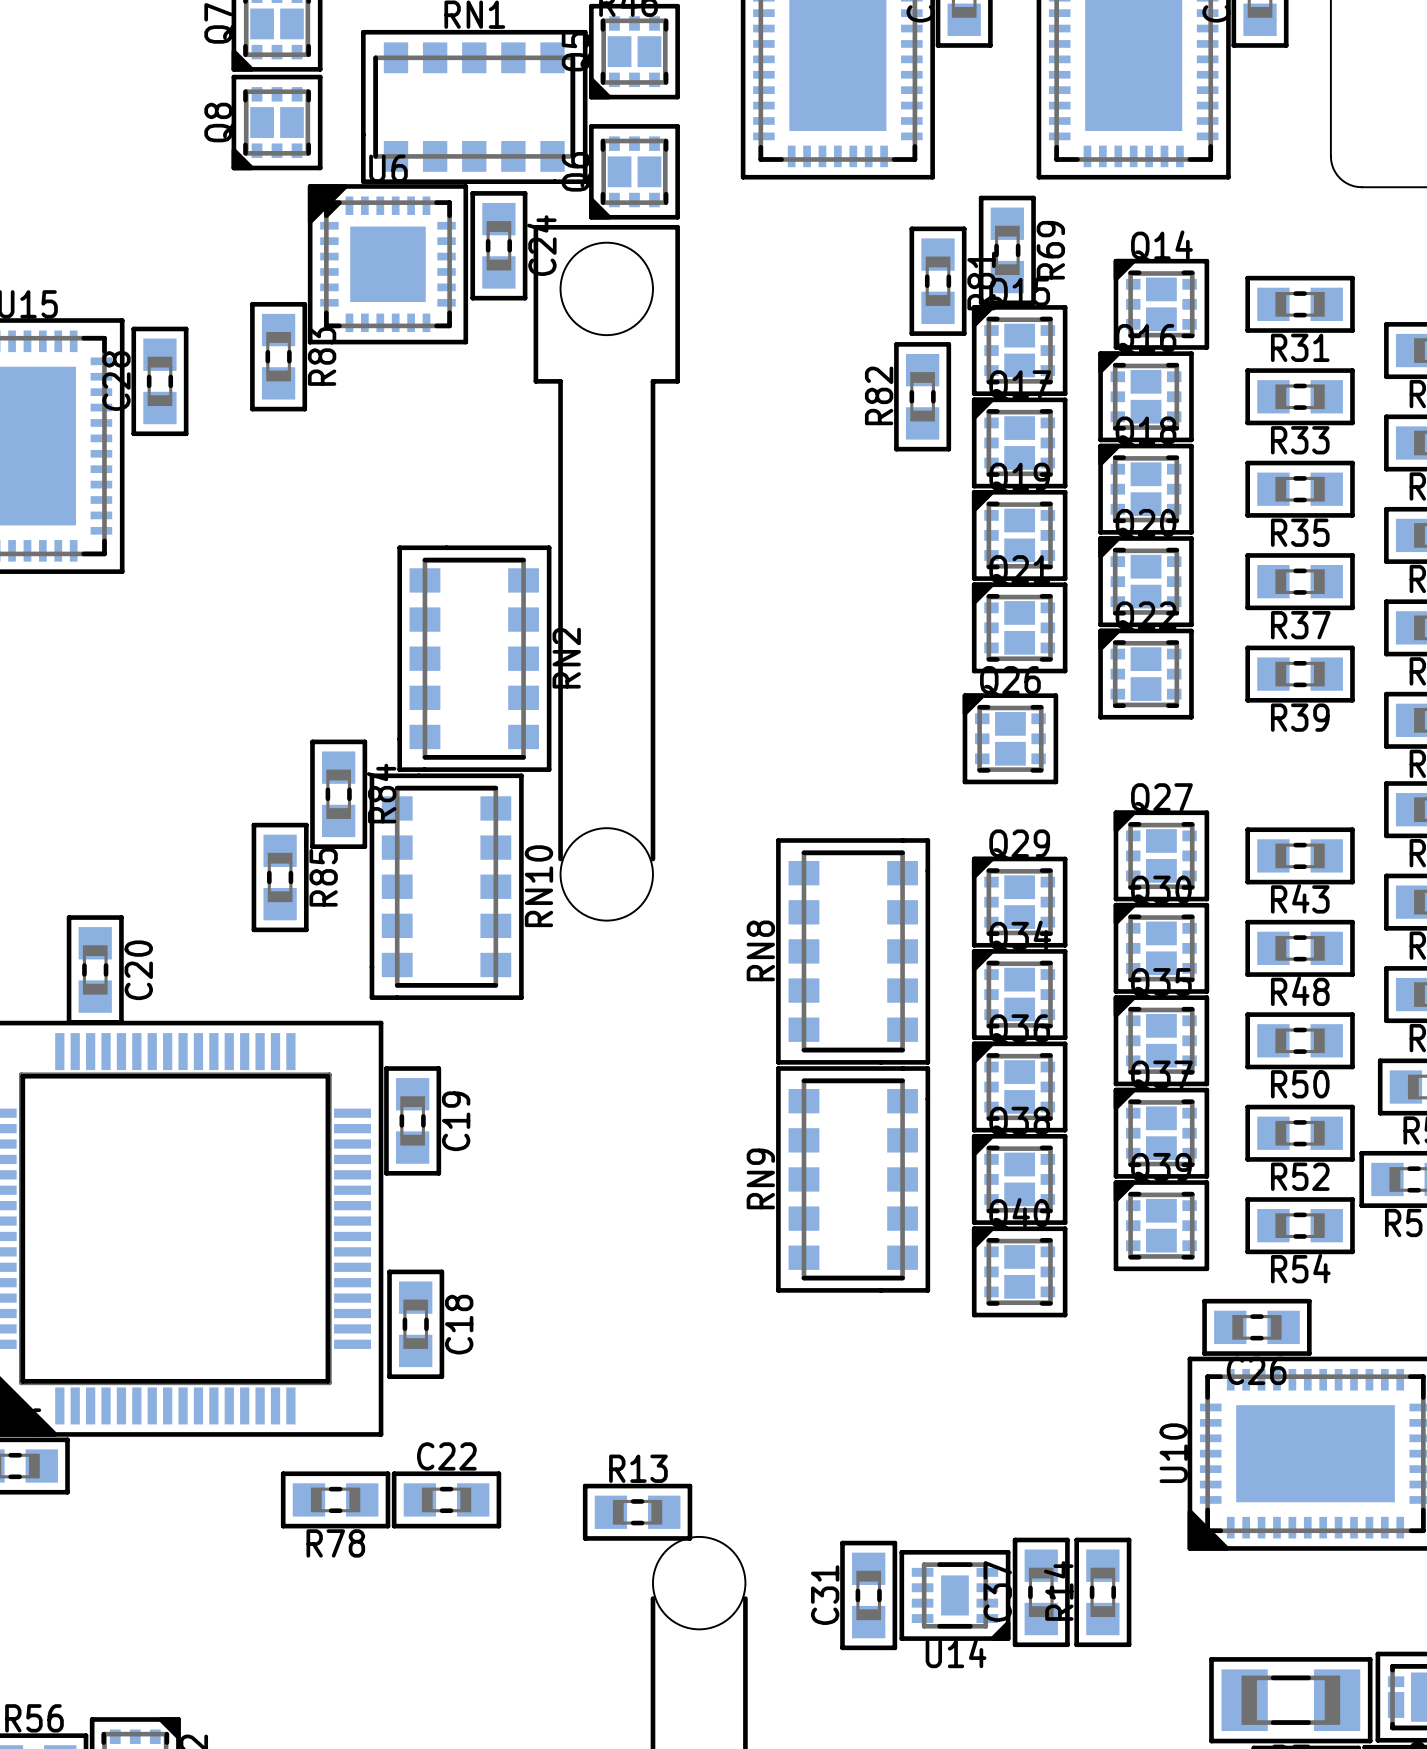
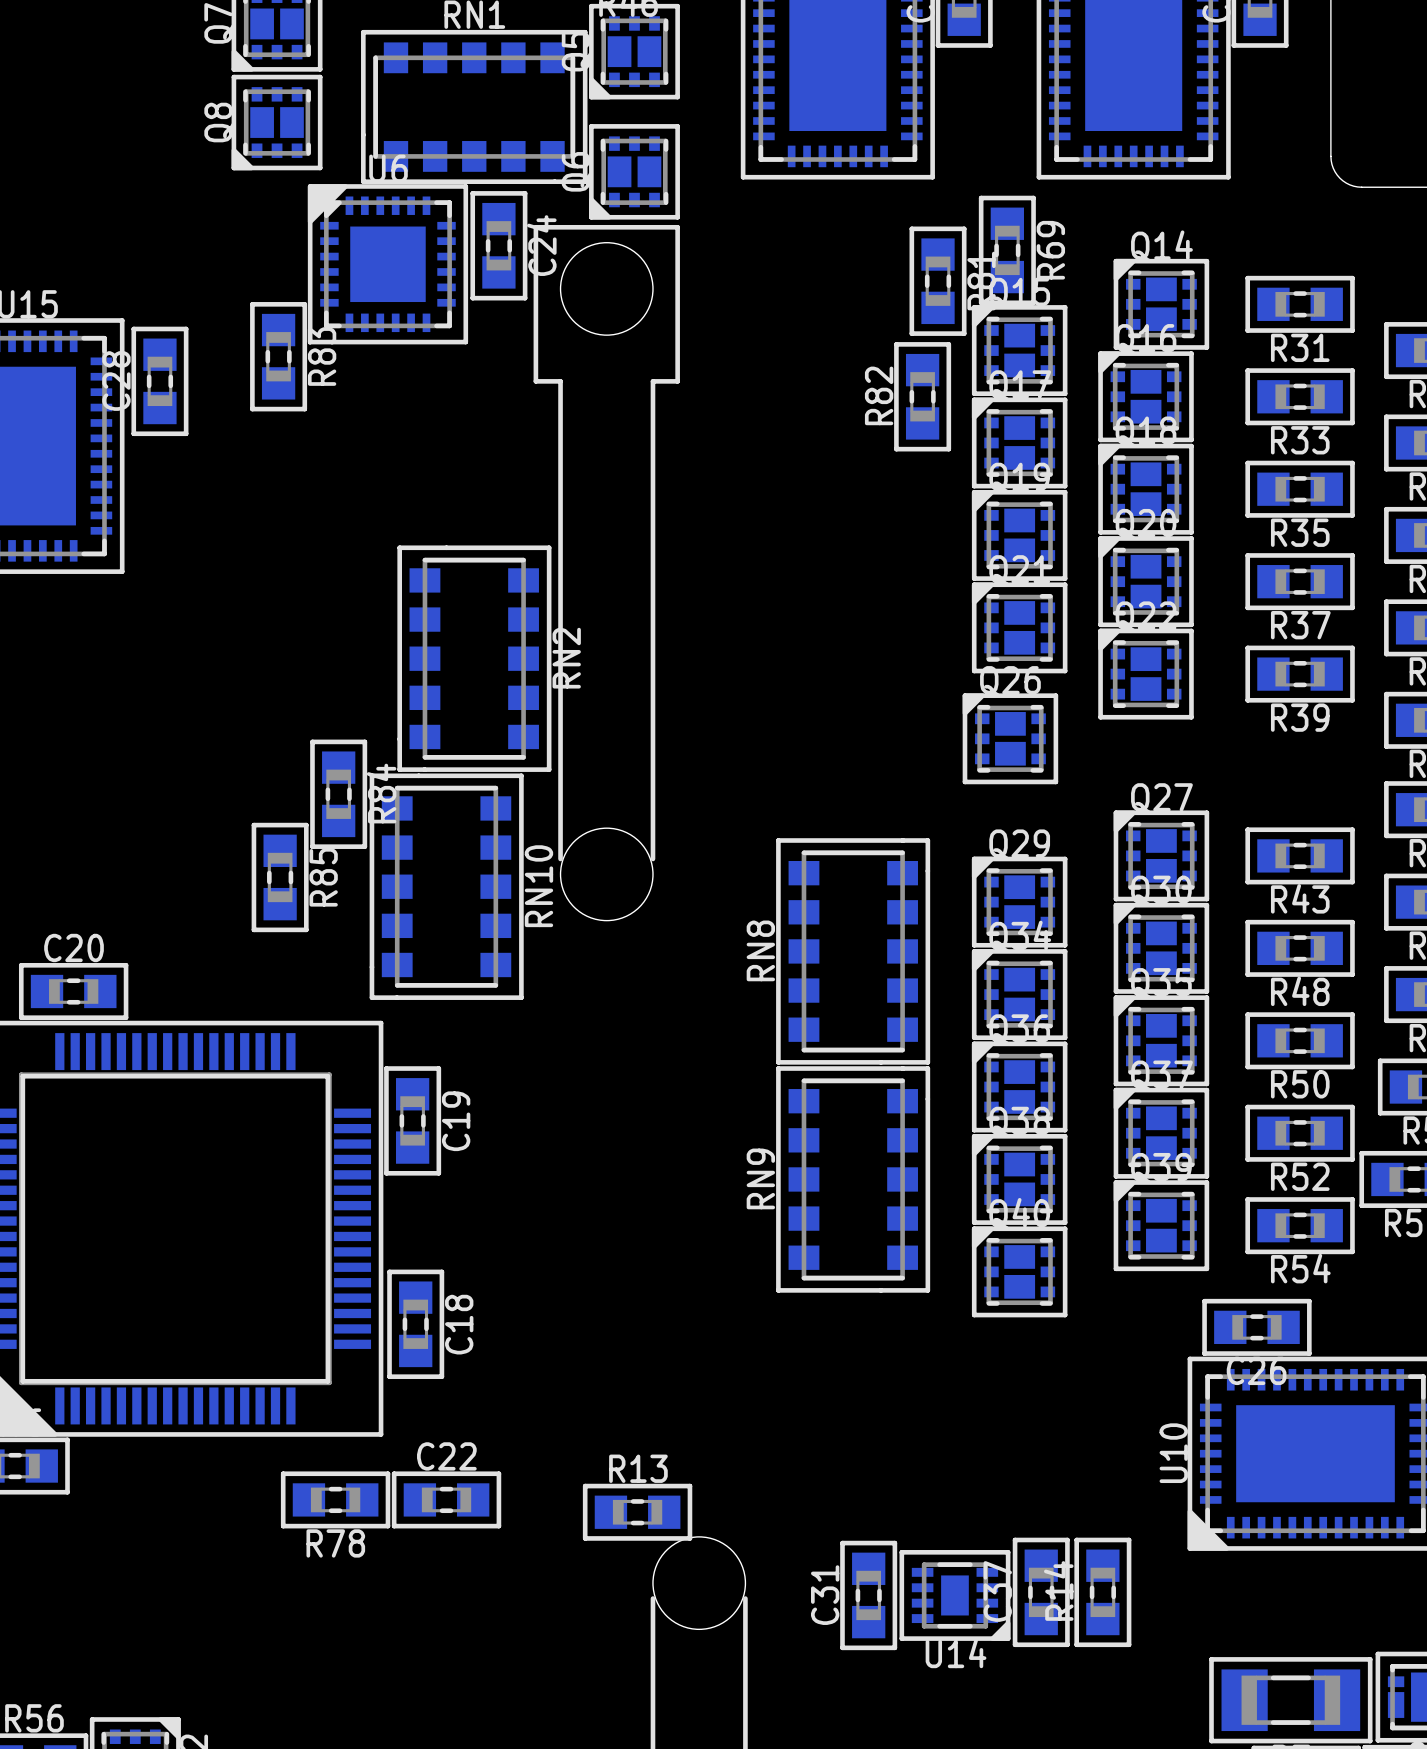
C20 rotation: 0° (95, 969) -> 90° clockwise (73, 991)

